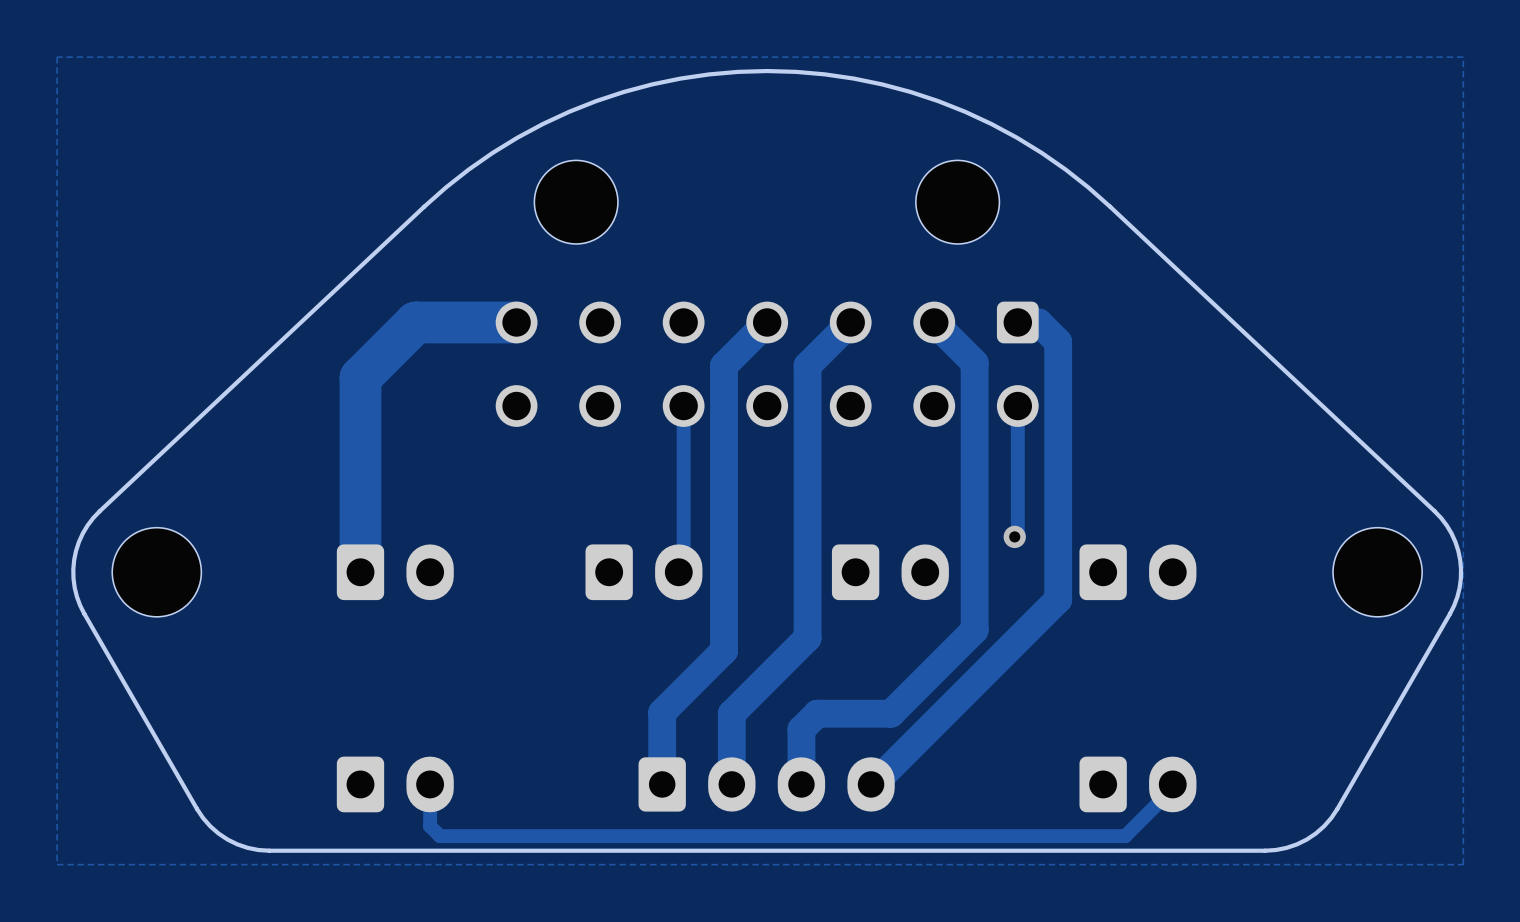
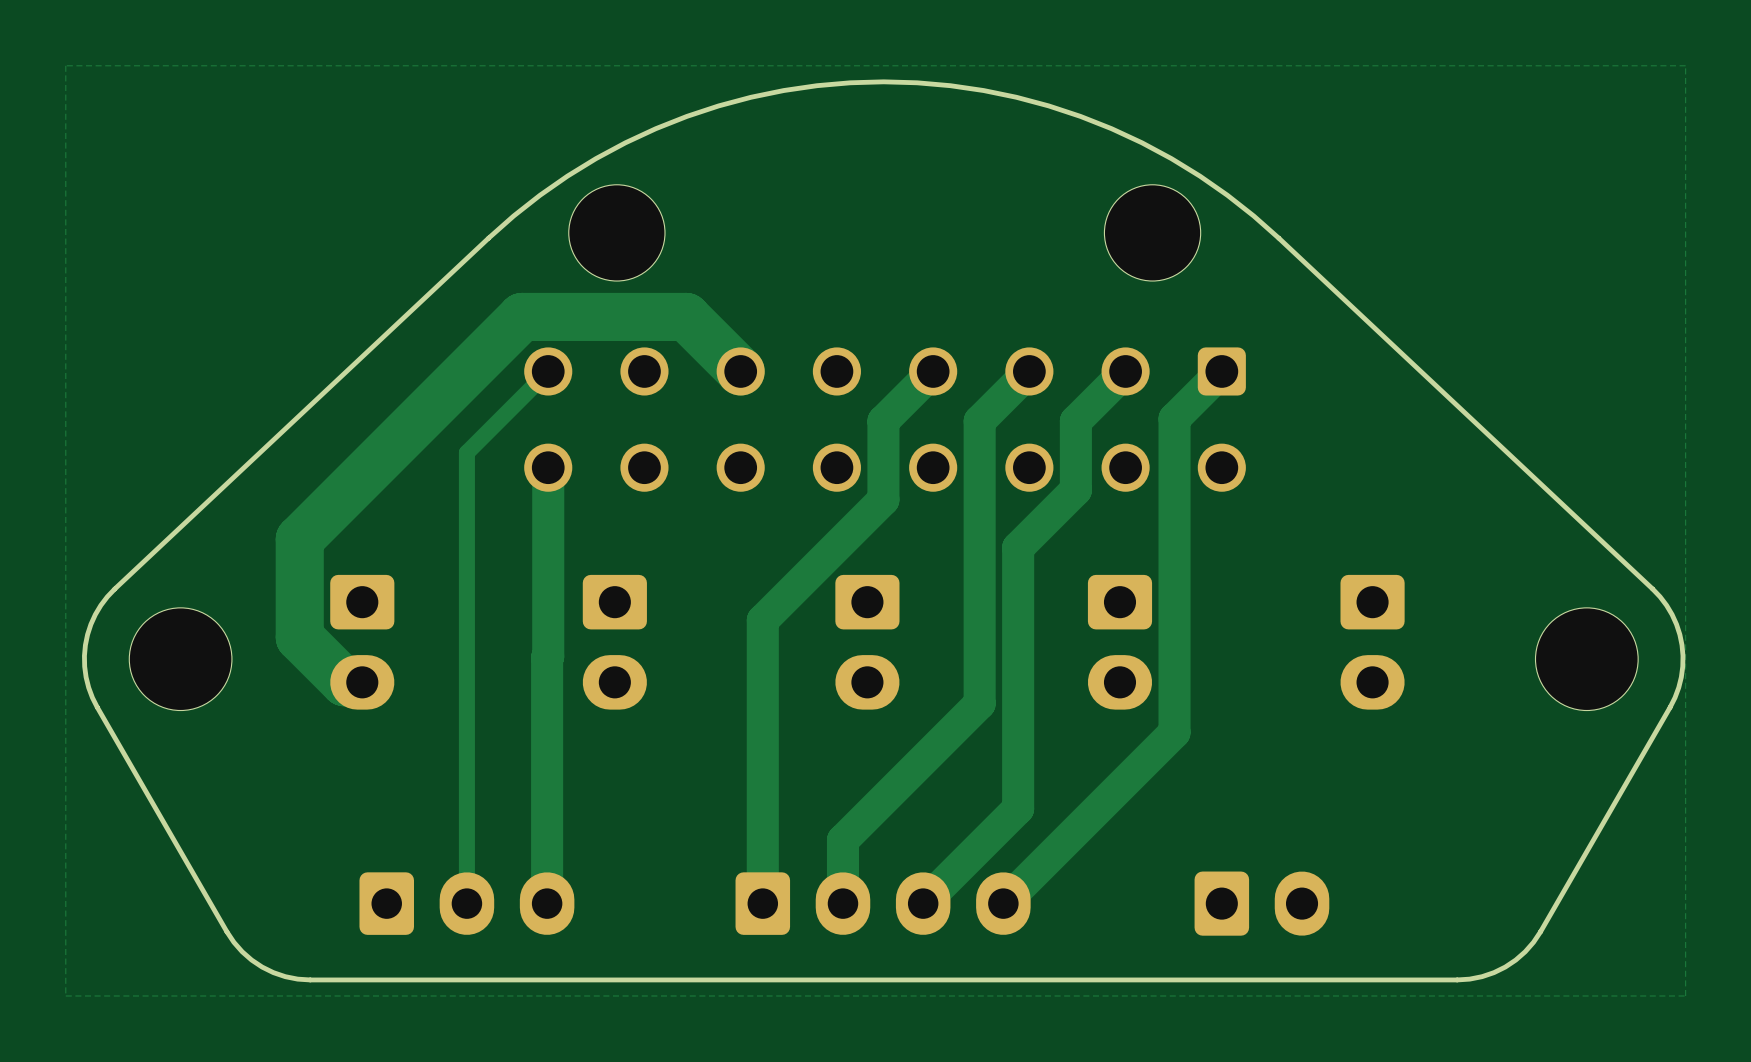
part footprint: [495, 160, 1039, 427] -> [524, 184, 1246, 492]
track: none -> (548, 371) (466, 452) (466, 903)
track: (516, 322) (415, 322) (360, 377) (360, 572) -> none
track: none -> (740, 371) (686, 316) (522, 316) (299, 539) (299, 637) (344, 682) (362, 682)
track: (767, 322) (724, 365) (724, 650) (662, 712) -> (933, 371) (883, 421) (883, 499) (762, 620) (762, 820)
track: (850, 322) (807, 365) (807, 637) (731, 713) (731, 729) -> (1029, 371) (979, 421) (979, 703) (842, 840)
track: (934, 322) (974, 362) (974, 630) (890, 713) (817, 713) (801, 729) (801, 784) -> (1125, 371) (1075, 421) (1075, 490) (1018, 547) (1018, 808) (923, 903)
track: (1017, 322) (1038, 322) (1058, 341) (1058, 599) (873, 784) -> none
track: none -> (1221, 371) (1174, 418) (1174, 732) (1003, 903)
track: none -> (548, 467) (547, 903)
track: (683, 406) (683, 567) (678, 572) -> none
via: (1014, 536) -> none
part: none -> (362, 642)
part: none -> (614, 642)
part: none -> (867, 642)
part: none -> (1119, 642)
part: (395, 572) -> none
part: (643, 572) -> none
part: (890, 572) -> none
part rotation: 0° (1137, 572) -> 90° clockwise (1372, 642)
part footprint: [336, 756, 454, 813] -> [359, 872, 575, 935]
part position: (1137, 784) -> (1261, 903)
track: (1172, 784) (1172, 788) (1125, 836) (439, 836) (430, 826) (430, 784) -> none

